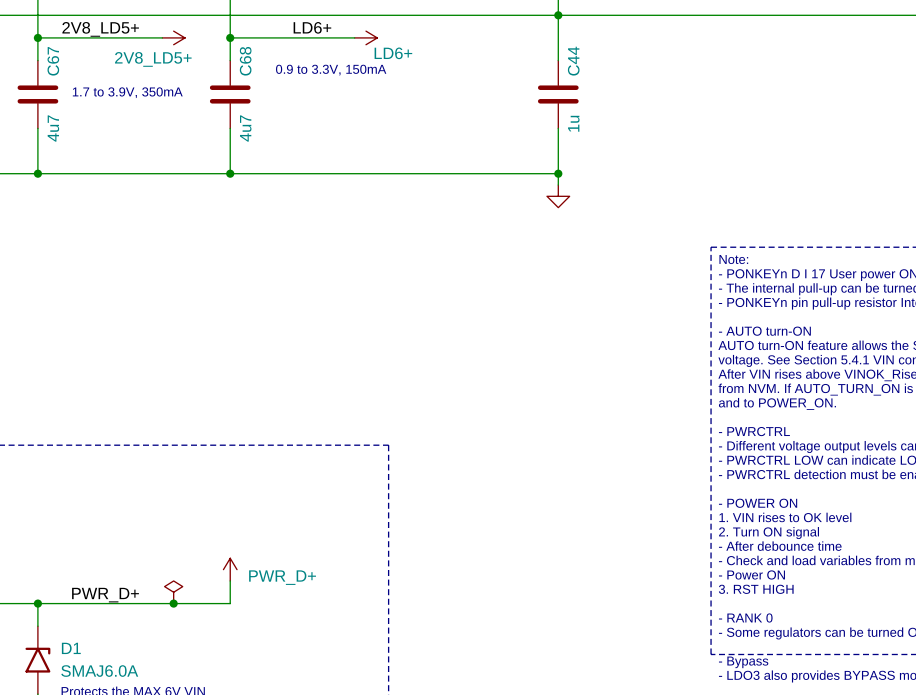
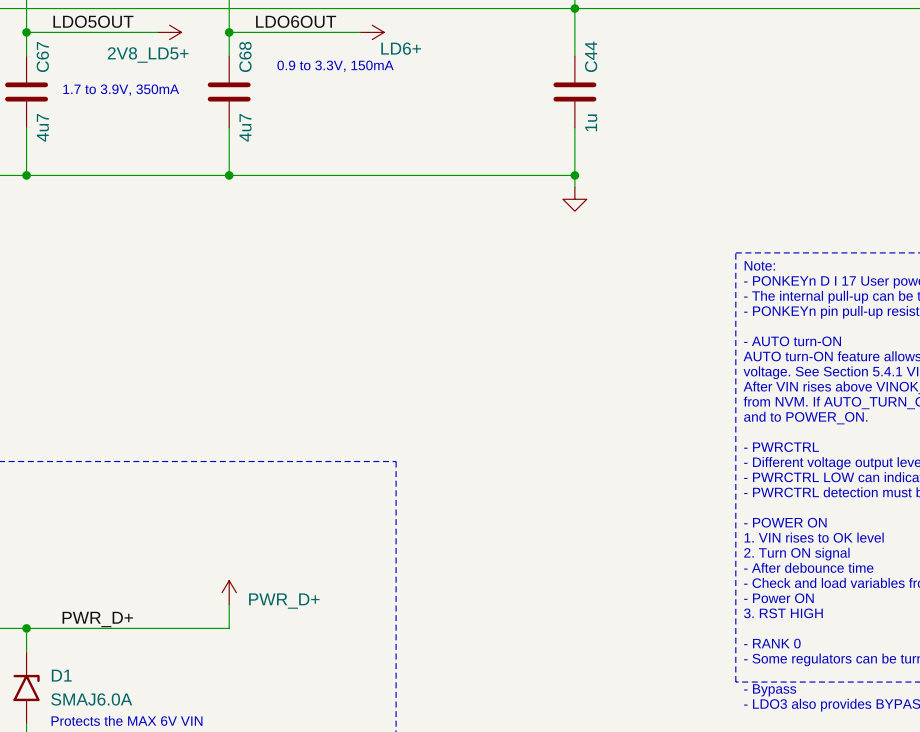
label: LD6+ (312, 27) -> LDO6OUT (296, 21)
label: 2V8_LD5+ (100, 29) -> LDO5OUT (93, 21)
power symbol: (173, 592) -> none
junction: (173, 603) -> none

